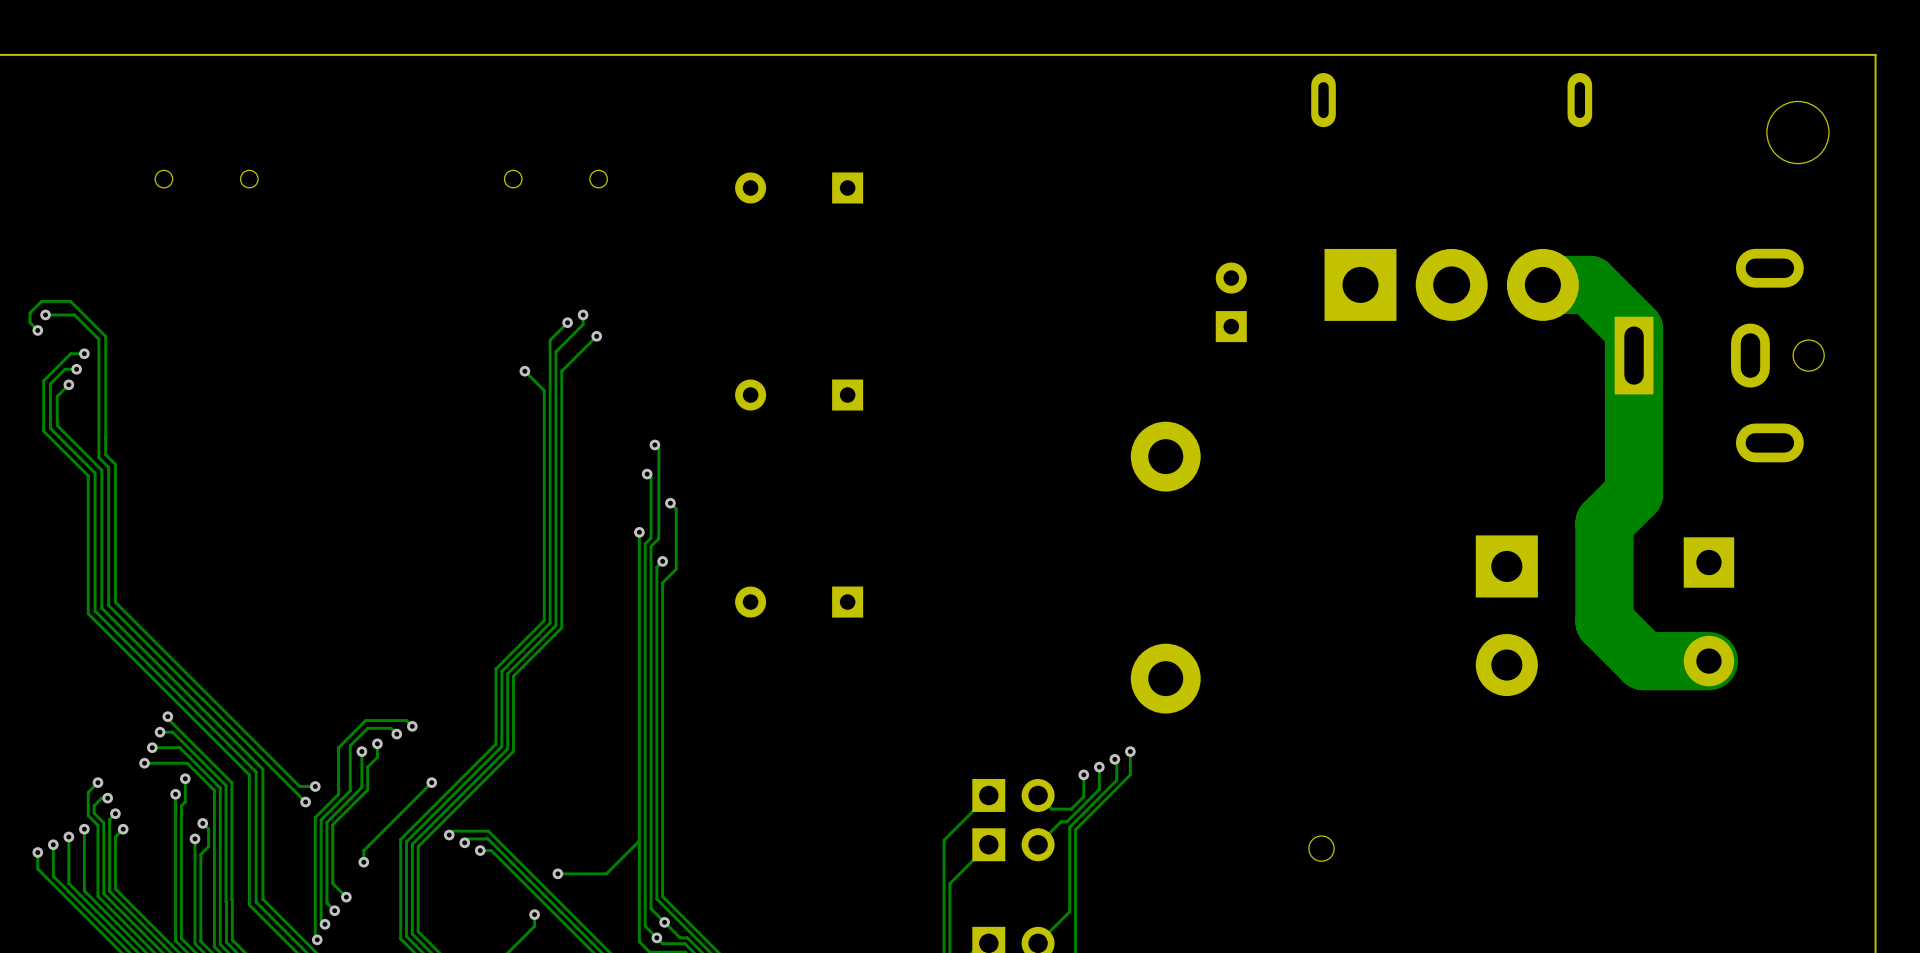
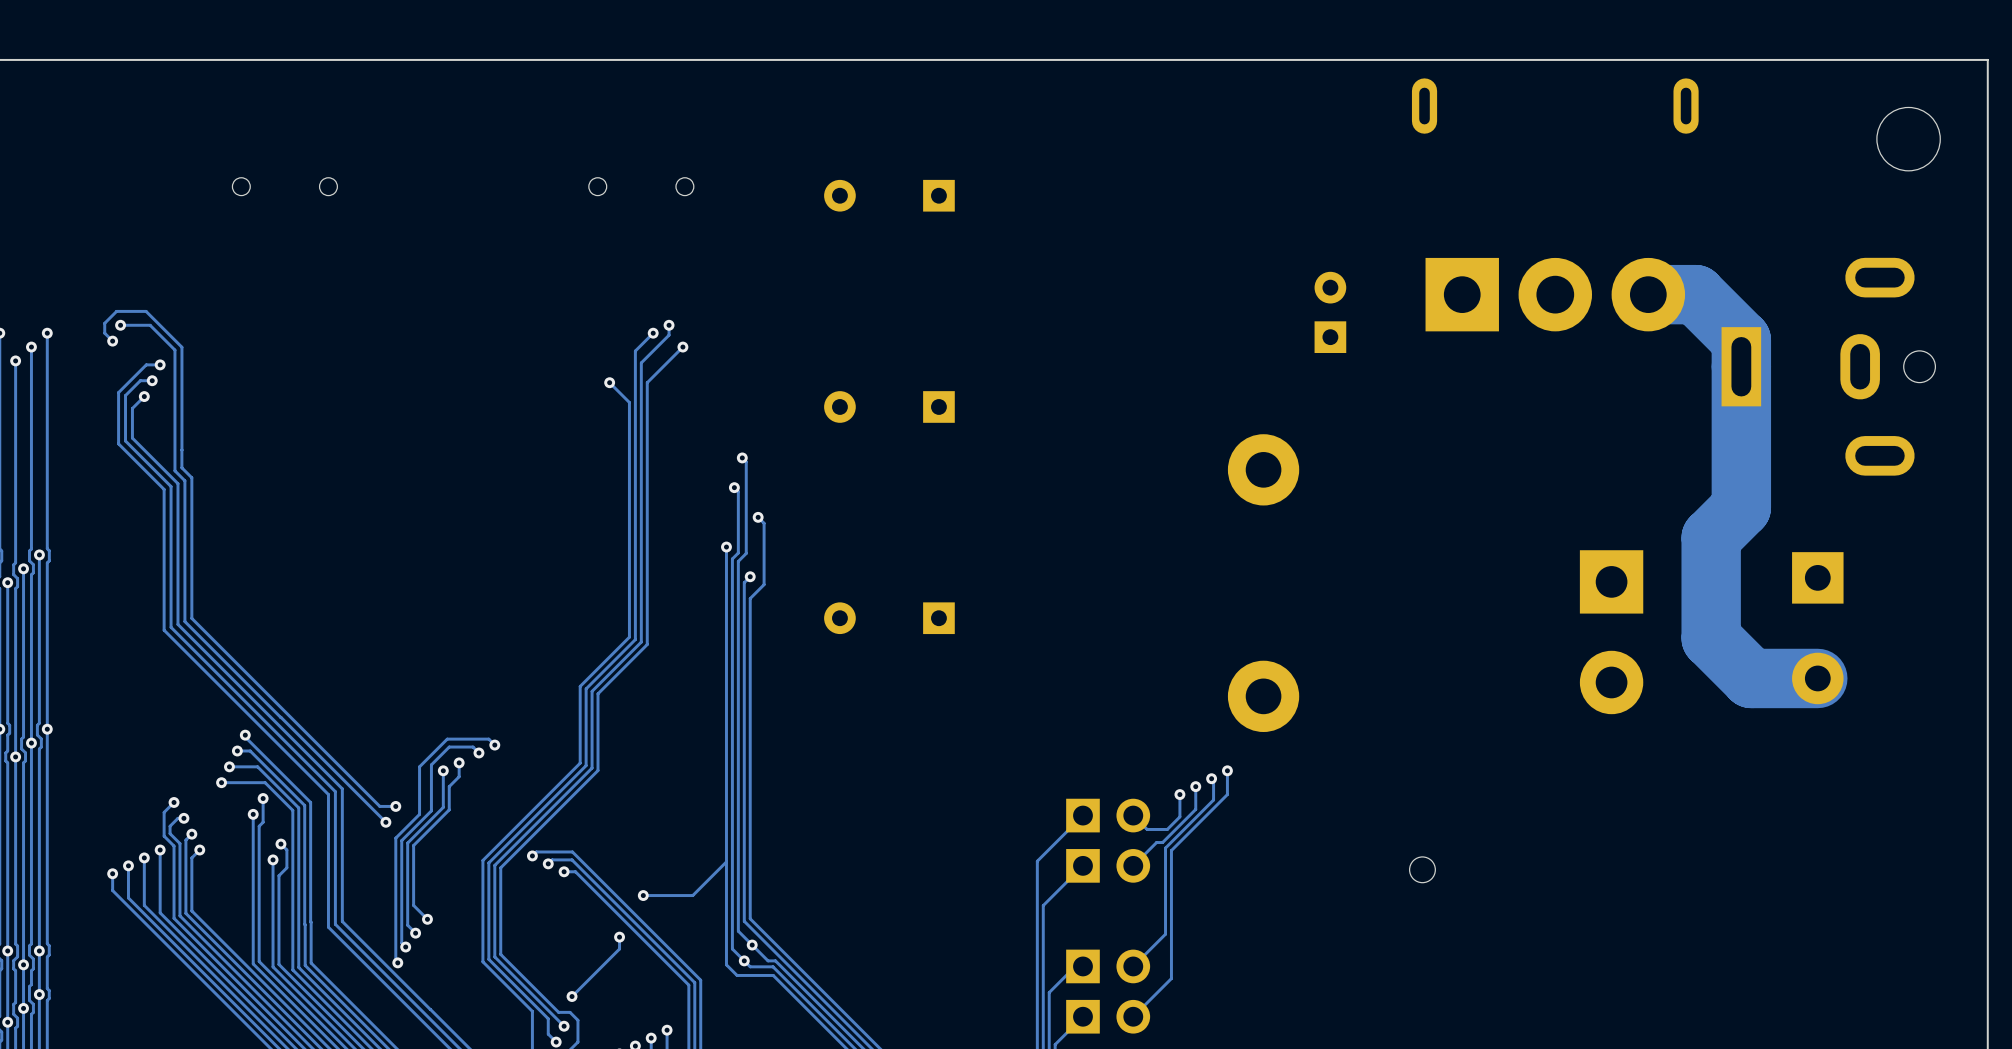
track: (431, 782) (363, 850) (363, 862) -> none
via: (431, 782) -> none
via: (363, 862) -> none

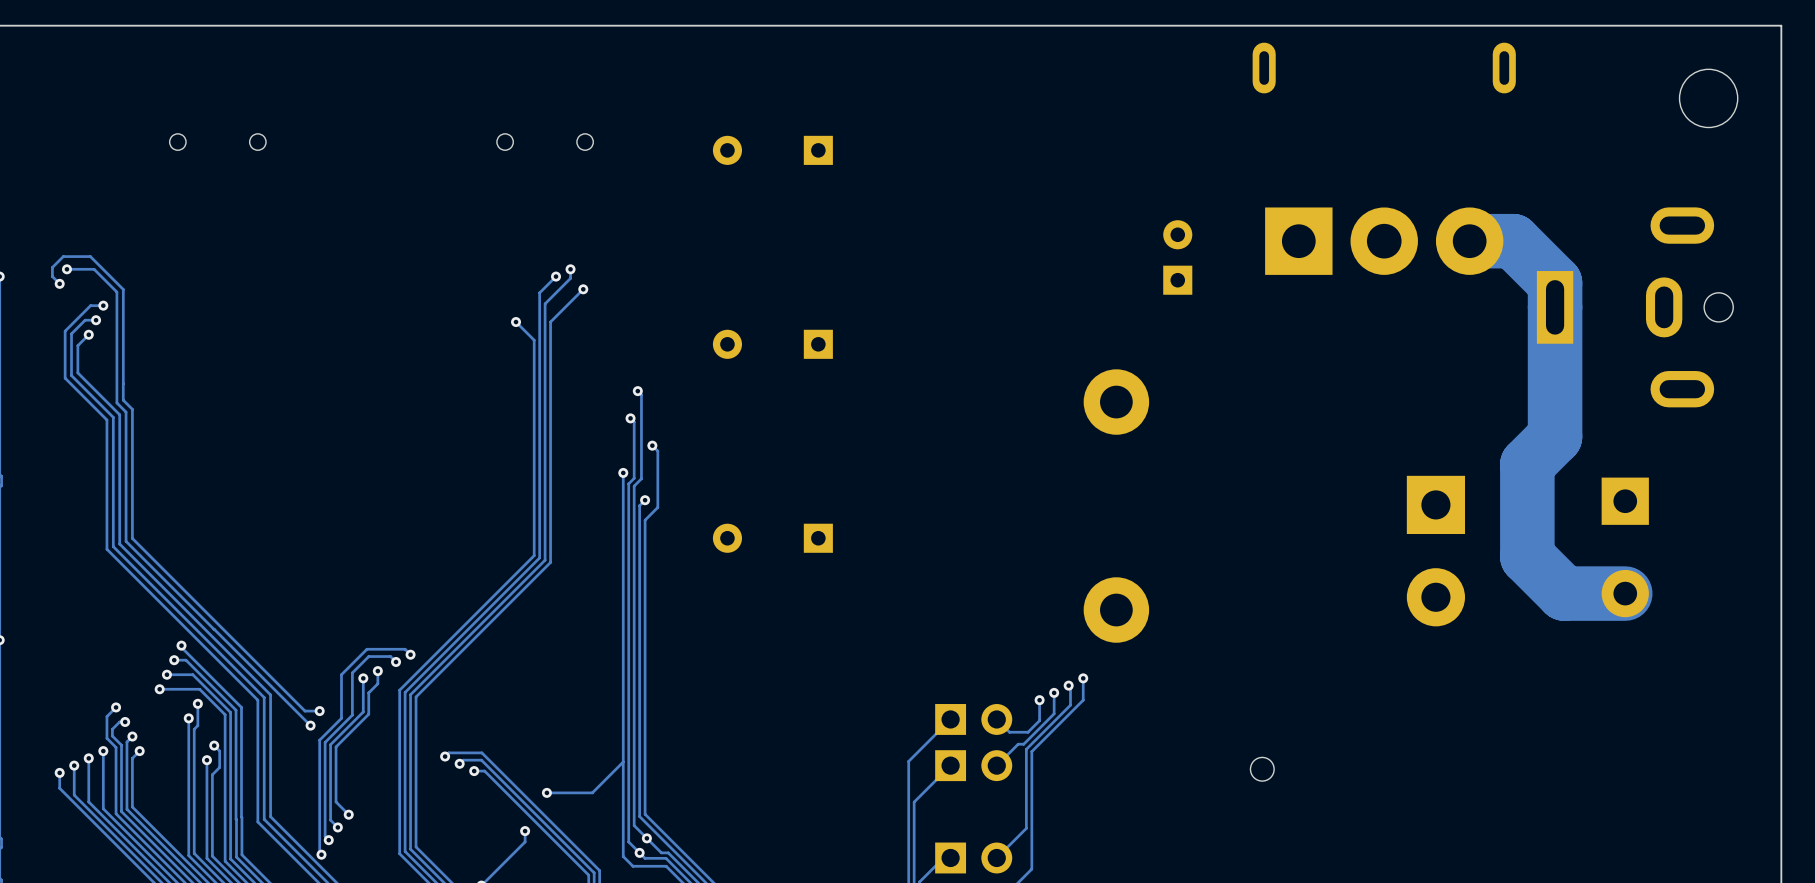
track: (580, 686) (580, 763) (482, 860) -> (488, 600) (399, 690) (399, 760)
track: (586, 688) (586, 765) (488, 862) -> (494, 603) (405, 692) (405, 762)
track: (592, 691) (592, 768) (494, 865) -> (499, 605) (410, 694) (410, 765)
track: (598, 693) (598, 770) (500, 867) -> (505, 607) (416, 696) (416, 767)

